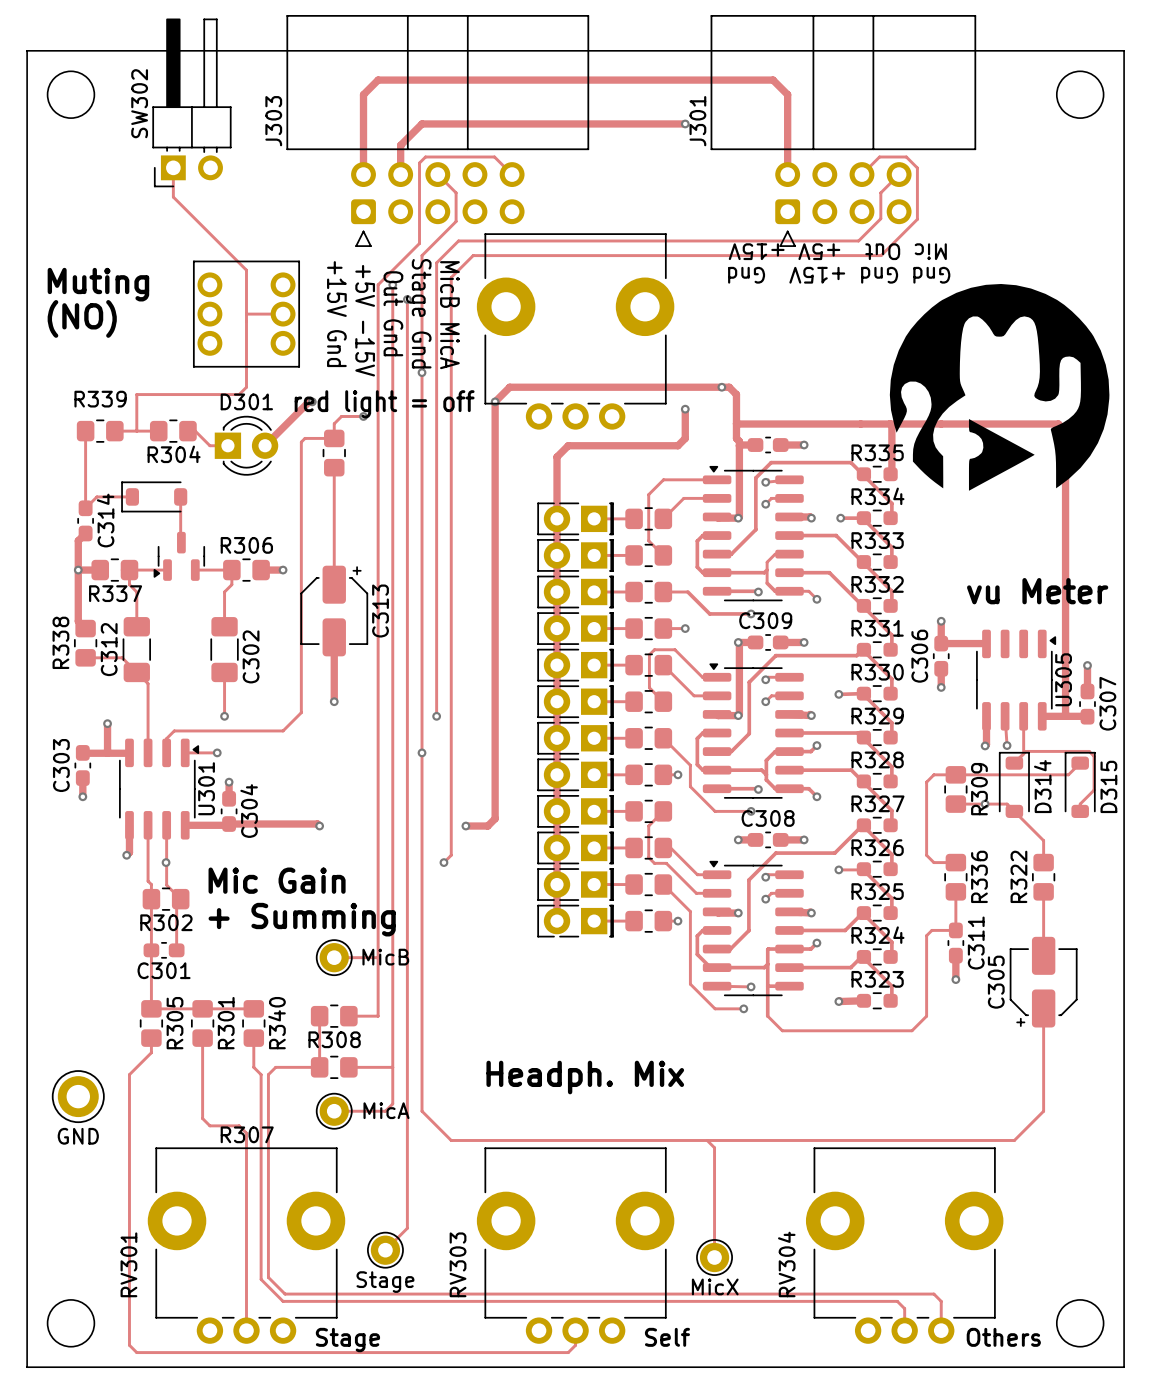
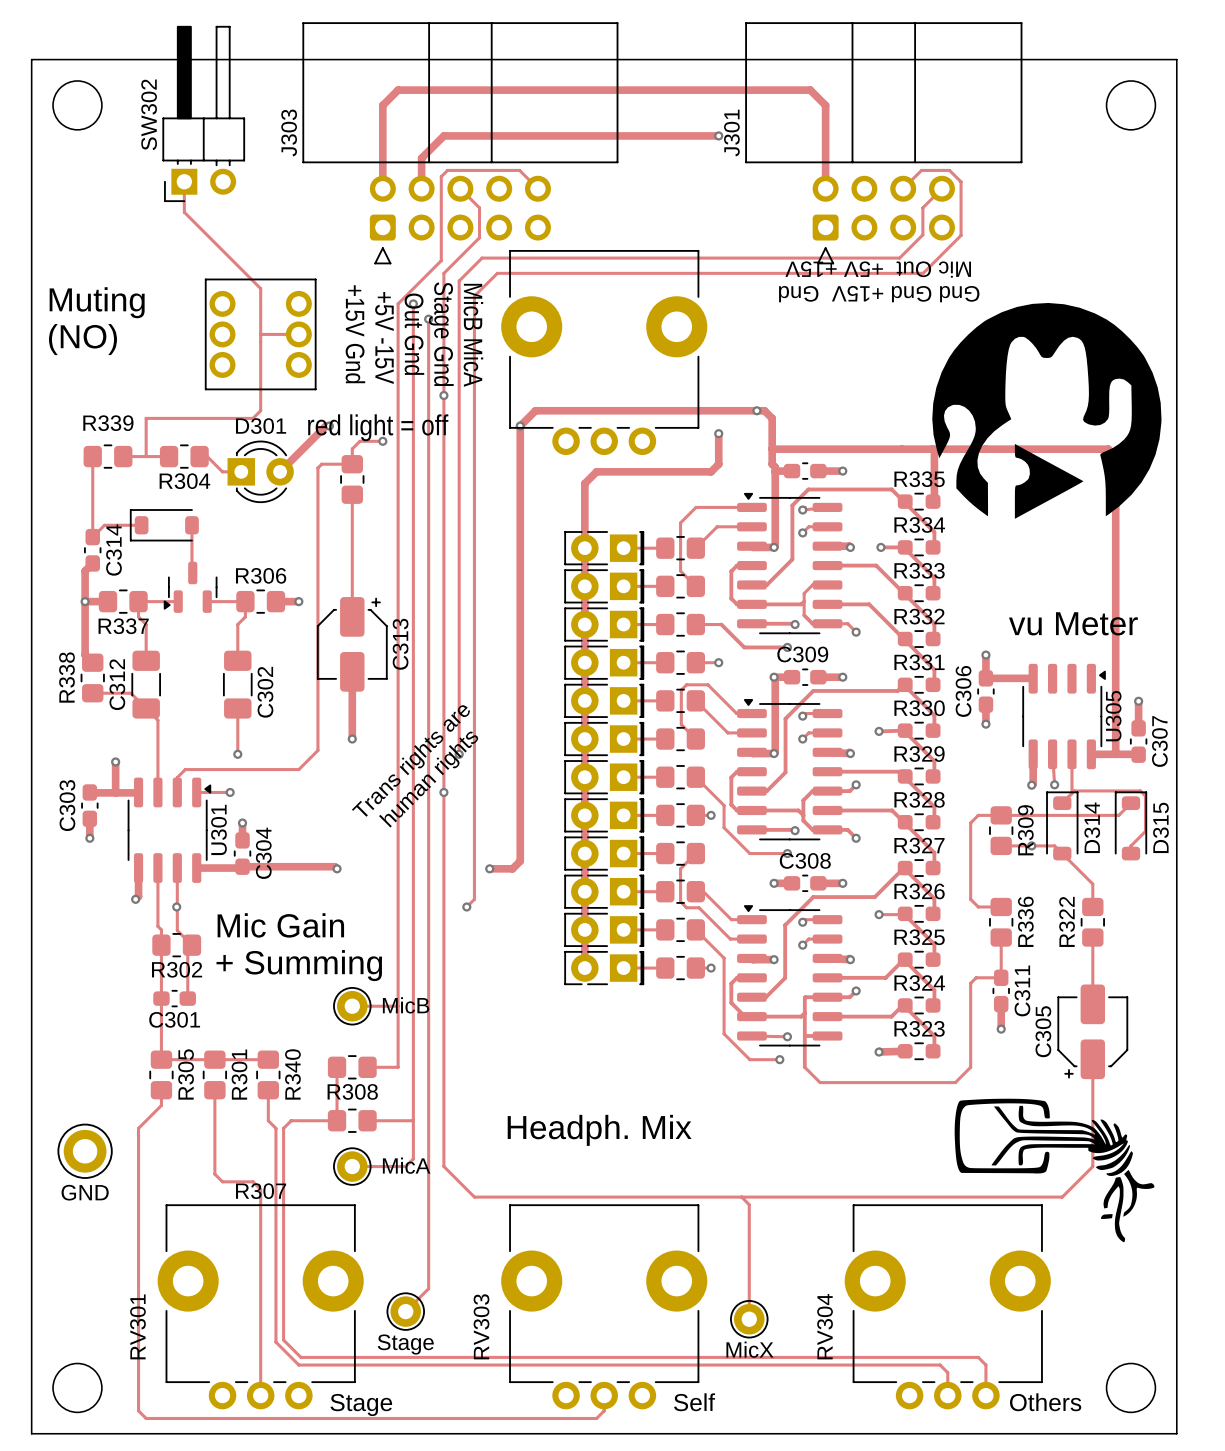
text: none -> Trans rights are (411, 759)
text: none -> human rights (428, 779)
drawing: none -> [954, 1098, 1155, 1243]

